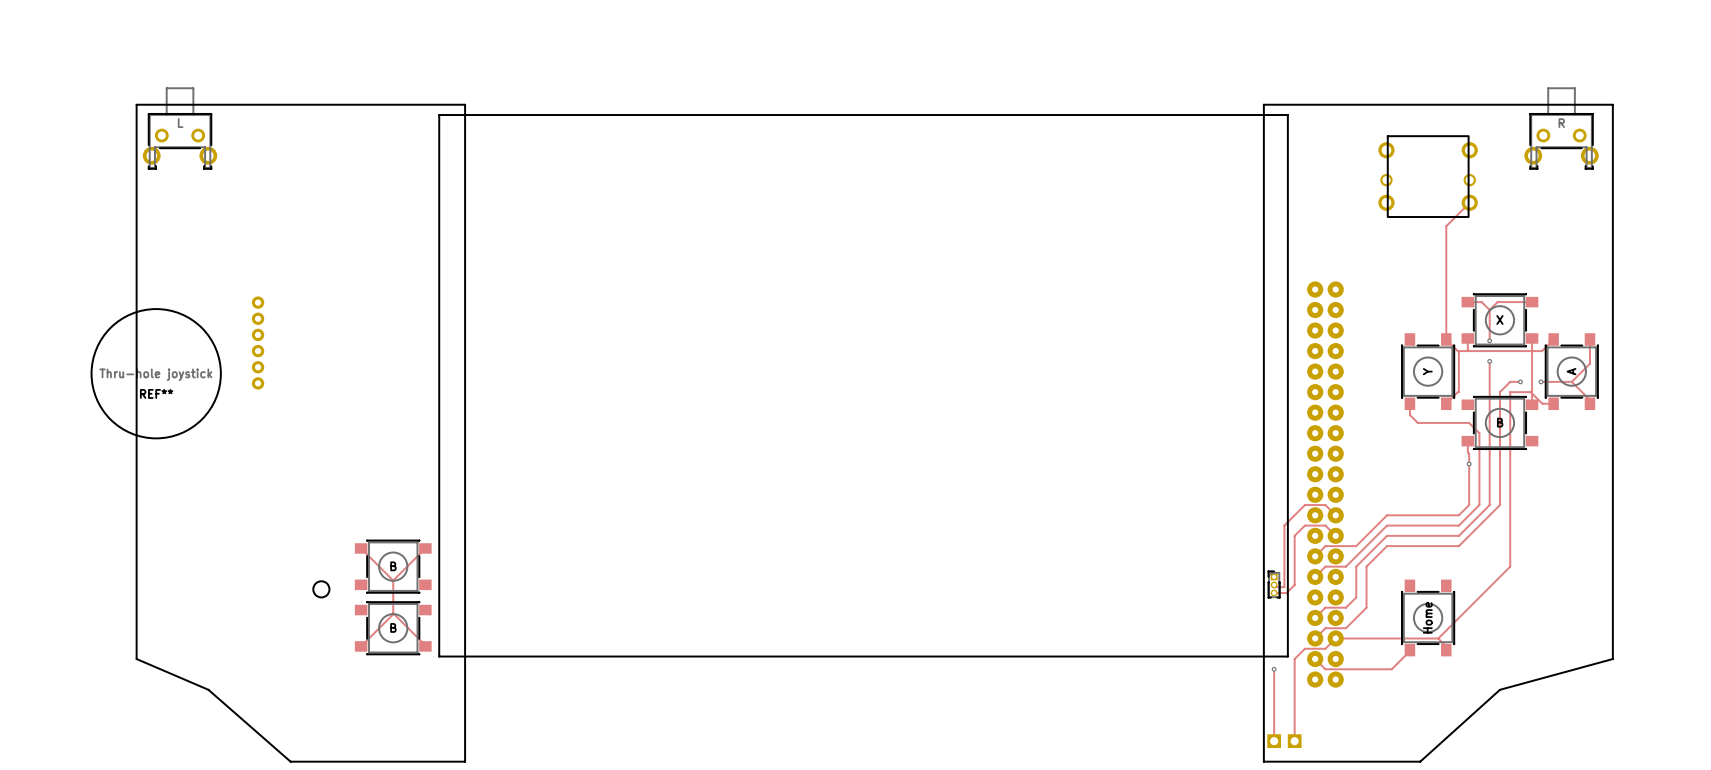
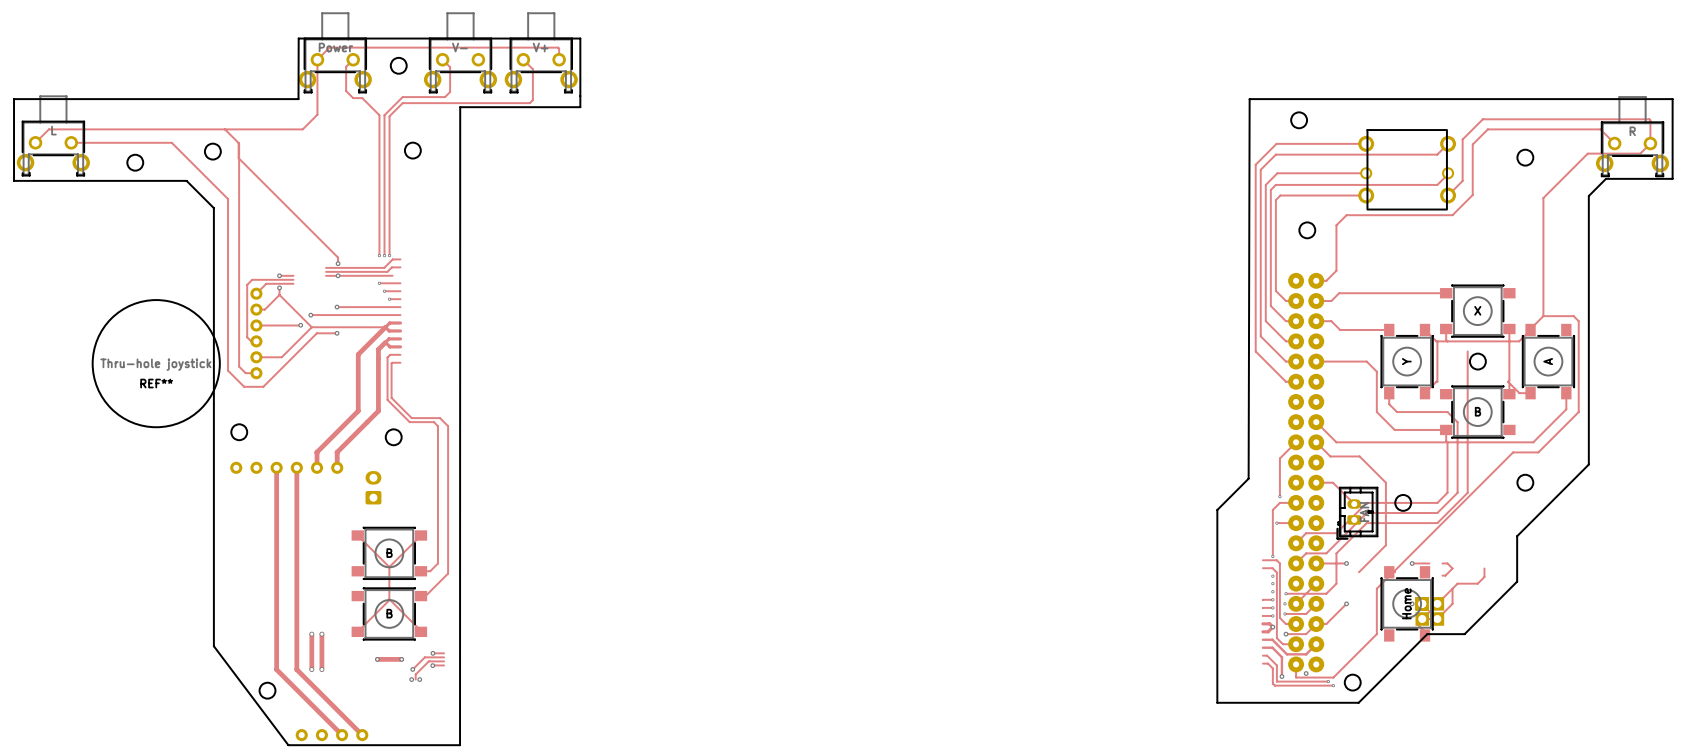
part: none -> (335, 52)
part: none -> (460, 52)
part: none -> (541, 52)
round board edge: none -> [390, 57, 407, 74]
track: none -> (353, 59) (346, 66) (346, 91) (353, 98) (362, 98) (379, 115) (379, 255)
track: none -> (442, 59) (450, 67) (450, 92) (445, 97) (402, 97) (384, 115) (384, 255)
track: none -> (523, 59) (532, 69) (532, 100) (529, 103) (402, 103) (389, 116) (389, 255)
track: none -> (559, 59) (558, 47) (329, 47) (317, 59) (317, 114) (302, 129) (48, 129) (35, 142)
board edge: (136, 104) (136, 659) (208, 689) (290, 761) -> (136, 99) (14, 99) (14, 180) (186, 180) (213, 208) (213, 646) (288, 745)
board edge: (300, 104) (465, 104) (465, 761) -> (298, 99) (298, 38) (580, 38) (580, 107) (460, 107) (460, 745)
board edge: (1267, 104) (1263, 104) (1263, 761) (1420, 761) (1499, 689) (1612, 659) (1612, 476) -> (1249, 99) (1248, 478) (1217, 509) (1217, 702) (1358, 702) (1427, 634) (1464, 634) (1517, 581) (1517, 536) (1588, 464)
board edge: (1612, 104) (1612, 203) -> (1588, 99) (1672, 99) (1672, 178) (1605, 178) (1588, 196)
line: (439, 115) (1287, 115) (1287, 656) (439, 656) (439, 115) -> none
round board edge: none -> [1290, 112, 1308, 129]
part position: (180, 128) -> (53, 135)
part position: (1561, 128) -> (1632, 136)
track: none -> (225, 129) (239, 143) (239, 366) (245, 373) (256, 373)
round board edge: none -> [404, 142, 422, 159]
track: none -> (71, 142) (171, 142) (228, 199) (228, 370) (244, 386) (263, 386) (316, 333) (337, 333)
round board edge: none -> [204, 143, 222, 160]
track: none -> (238, 143) (238, 158) (338, 257) (338, 263)
track: none -> (1614, 143) (1600, 129) (1487, 129) (1472, 144) (1472, 195) (1452, 215) (1346, 215) (1336, 225) (1336, 270) (1326, 280) (1316, 280)
track: none -> (1366, 143) (1276, 143) (1255, 164) (1255, 351) (1285, 381) (1296, 381)
track: none -> (1448, 143) (1437, 154) (1275, 154) (1260, 169) (1260, 336) (1285, 361) (1296, 361)
round board edge: none -> [1517, 149, 1534, 166]
round board edge: none -> [127, 154, 144, 171]
track: none -> (1366, 173) (1277, 173) (1265, 184) (1265, 321) (1285, 341) (1296, 341)
track: none -> (1448, 173) (1437, 184) (1275, 184) (1270, 189) (1270, 306) (1285, 321) (1296, 321)
track: none -> (1366, 195) (1280, 195) (1275, 200) (1275, 290) (1285, 301) (1296, 301)
track: (1469, 202) (1446, 226) (1446, 339) -> (1448, 195) (1462, 180) (1462, 139) (1482, 119) (1650, 120) (1650, 143) (1640, 153) (1587, 153) (1543, 198) (1543, 316)
round board edge: none -> [1299, 222, 1316, 239]
via: none -> (379, 255)
via: none -> (384, 255)
via: none -> (389, 255)
track: none -> (400, 259) (392, 259) (384, 267) (326, 267)
via: none -> (338, 263)
track: none -> (400, 267) (391, 267) (387, 271) (326, 271)
track: none -> (279, 275) (293, 275)
via: none -> (279, 275)
track: none -> (326, 275) (392, 275)
via: none -> (338, 275)
track: none -> (293, 279) (252, 279) (247, 284) (247, 337) (251, 341) (256, 341)
track: none -> (293, 283) (266, 283) (256, 293)
track: none -> (379, 283) (400, 283)
via: none -> (379, 283)
track: none -> (279, 287) (279, 294)
via: none -> (279, 287)
track: none -> (384, 291) (400, 291)
via: none -> (384, 291)
track: (1467, 302) (1481, 302) (1489, 310) -> (1446, 293) (1339, 293) (1331, 301) (1316, 301)
track: (1532, 302) (1497, 302) (1489, 310) -> none
track: none -> (279, 294) (311, 327)
track: none -> (279, 294) (264, 309) (256, 309)
track: none -> (389, 299) (400, 299)
via: none -> (389, 299)
track: (1489, 310) (1489, 340) -> none
track: none -> (337, 307) (400, 307)
via: none -> (337, 307)
track: none -> (310, 315) (400, 315)
via: none -> (310, 315)
track: none -> (1543, 316) (1530, 329)
track: none -> (1543, 316) (1573, 316) (1578, 321) (1578, 412) (1538, 452) (1513, 452) (1376, 588) (1376, 634) (1333, 677) (1296, 677) (1296, 664)
track: none -> (1316, 321) (1331, 321) (1340, 329) (1389, 329)
track: none -> (400, 323) (389, 323) (385, 327)
track: none -> (300, 325) (256, 325)
via: none -> (300, 325)
track: none -> (311, 327) (385, 327)
track: none -> (311, 327) (281, 357) (256, 357)
track: none -> (385, 327) (389, 330) (400, 330)
track: none -> (385, 327) (358, 354) (358, 411) (316, 452) (317, 467)
track: (1589, 339) (1589, 363) (1571, 381) -> none
via: (1489, 340) -> none
via: none -> (337, 333)
track: none -> (400, 338) (388, 338) (385, 342)
track: none -> (385, 342) (389, 346) (400, 346)
track: none -> (385, 342) (378, 349) (378, 411) (337, 452) (337, 467)
via: (1489, 361) -> none
round board edge: none -> [1469, 353, 1487, 370]
track: none -> (400, 354) (390, 354) (387, 357) (387, 399) (409, 422) (433, 422) (438, 426) (438, 563) (430, 571) (420, 571)
track: none -> (1316, 361) (1366, 361) (1376, 371) (1376, 412) (1394, 429) (1446, 429)
track: none -> (400, 362) (391, 363) (391, 397) (411, 418) (440, 418) (448, 426) (448, 573) (425, 596) (420, 596)
track: (1520, 381) (1510, 381) (1499, 392) (1499, 505) (1458, 546) (1387, 546) (1366, 566) (1366, 607) (1345, 628) (1325, 628) (1315, 638) -> (1262, 560) (1276, 560) (1279, 563) (1279, 617) (1285, 624) (1296, 624)
via: (1520, 381) -> none
track: (1541, 381) (1571, 381) -> none
via: (1541, 381) -> none
track: (1571, 381) (1589, 400) (1589, 403) -> (1316, 422) (1336, 442) (1533, 442) (1566, 409) (1566, 393)
track: (1530, 392) (1510, 392) (1510, 566) (1479, 597) -> (1484, 568) (1484, 576) (1477, 583) (1457, 583)
round board edge: none -> [231, 424, 248, 441]
round board edge: none -> [385, 429, 402, 446]
track: none -> (1296, 442) (1279, 458) (1279, 496)
track: none -> (1316, 442) (1330, 456) (1359, 456) (1385, 482) (1385, 545) (1358, 572)
via: (1469, 464) -> none
track: none -> (276, 467) (276, 669) (342, 735)
part: none -> (286, 467)
track: none -> (296, 467) (296, 669) (362, 735)
round board edge: none -> [1517, 474, 1534, 491]
track: none -> (1316, 482) (1332, 482) (1354, 504)
part: none -> (373, 487)
round board edge: none -> [1395, 494, 1412, 512]
via: none -> (1279, 496)
track: none -> (1296, 502) (1279, 502) (1272, 509) (1272, 556)
track: (1335, 515) (1325, 505) (1304, 505) (1284, 525) (1284, 587) (1276, 587) (1274, 584) -> none
part: none -> (1357, 513)
track: none -> (1276, 523) (1296, 523)
via: none -> (1276, 523)
track: (1335, 535) (1325, 525) (1304, 525) (1294, 535) (1294, 584) (1286, 593) (1274, 593) -> none
via: none -> (1272, 556)
track: none -> (1316, 563) (1346, 563)
via: none -> (1346, 563)
track: none -> (1412, 563) (1429, 563)
via: none -> (1412, 563)
track: none -> (1442, 563) (1447, 563) (1452, 568) (1445, 575) (1442, 575)
round board edge: [313, 581, 330, 598] -> none
part: (1274, 584) -> none
via: none -> (1272, 576)
via: none -> (1272, 583)
track: none -> (1316, 583) (1306, 593) (1285, 593)
track: none -> (1452, 588) (1452, 603) (1437, 619) (1422, 619)
via: none -> (1272, 591)
via: none -> (1285, 593)
track: none -> (1272, 599) (1262, 600)
via: none -> (1272, 599)
via: none -> (1284, 603)
track: none -> (1316, 603) (1306, 613) (1284, 613)
via: none -> (1346, 603)
via: none -> (1412, 603)
part: none -> (1422, 603)
part: none -> (1437, 603)
track: none -> (1262, 607) (1272, 607)
via: none -> (1272, 607)
via: none -> (1284, 613)
track: none -> (1262, 615) (1272, 615)
via: none -> (1272, 615)
part: none -> (1422, 619)
part: none -> (1437, 619)
track: none -> (1262, 623) (1269, 623) (1272, 627) (1268, 631) (1262, 631)
track: (1345, 638) (1438, 638) -> (1326, 624) (1346, 603)
via: none -> (1272, 627)
track: none -> (311, 634) (311, 669)
via: none -> (311, 634)
track: none -> (321, 634) (321, 669)
via: none -> (321, 634)
track: (1304, 648) (1294, 659) (1294, 741) -> none
via: none -> (1285, 634)
track: (1412, 648) (1391, 669) (1325, 669) (1315, 659) -> (1262, 568) (1272, 568) (1276, 572) (1276, 638) (1282, 644) (1296, 644)
track: none -> (1262, 639) (1272, 639) (1286, 654) (1306, 654) (1316, 644)
track: none -> (1262, 647) (1272, 647) (1281, 657) (1281, 676)
track: none -> (432, 653) (444, 653)
via: none -> (432, 653)
track: (1274, 669) (1274, 741) -> none
via: (1274, 669) -> none
track: none -> (1262, 655) (1267, 655) (1276, 665) (1276, 681) (1328, 681)
track: none -> (444, 657) (424, 657) (412, 669)
track: none -> (377, 659) (401, 659)
via: none -> (377, 659)
via: none -> (401, 659)
track: none -> (444, 661) (428, 661) (415, 674) (415, 679)
track: none -> (1262, 663) (1267, 663) (1272, 668) (1272, 683) (1274, 685) (1333, 685)
via: none -> (432, 665)
track: none -> (444, 665) (432, 665)
via: none -> (311, 669)
via: none -> (321, 669)
via: none -> (412, 669)
via: none -> (1306, 673)
round board edge: none -> [1344, 674, 1361, 691]
via: none -> (1281, 676)
via: none -> (411, 679)
via: none -> (419, 679)
round board edge: none -> [259, 682, 276, 699]
via: none -> (1328, 681)
via: none -> (1333, 685)
part: (1274, 741) -> none
part: (1294, 741) -> none
part: none -> (332, 735)

